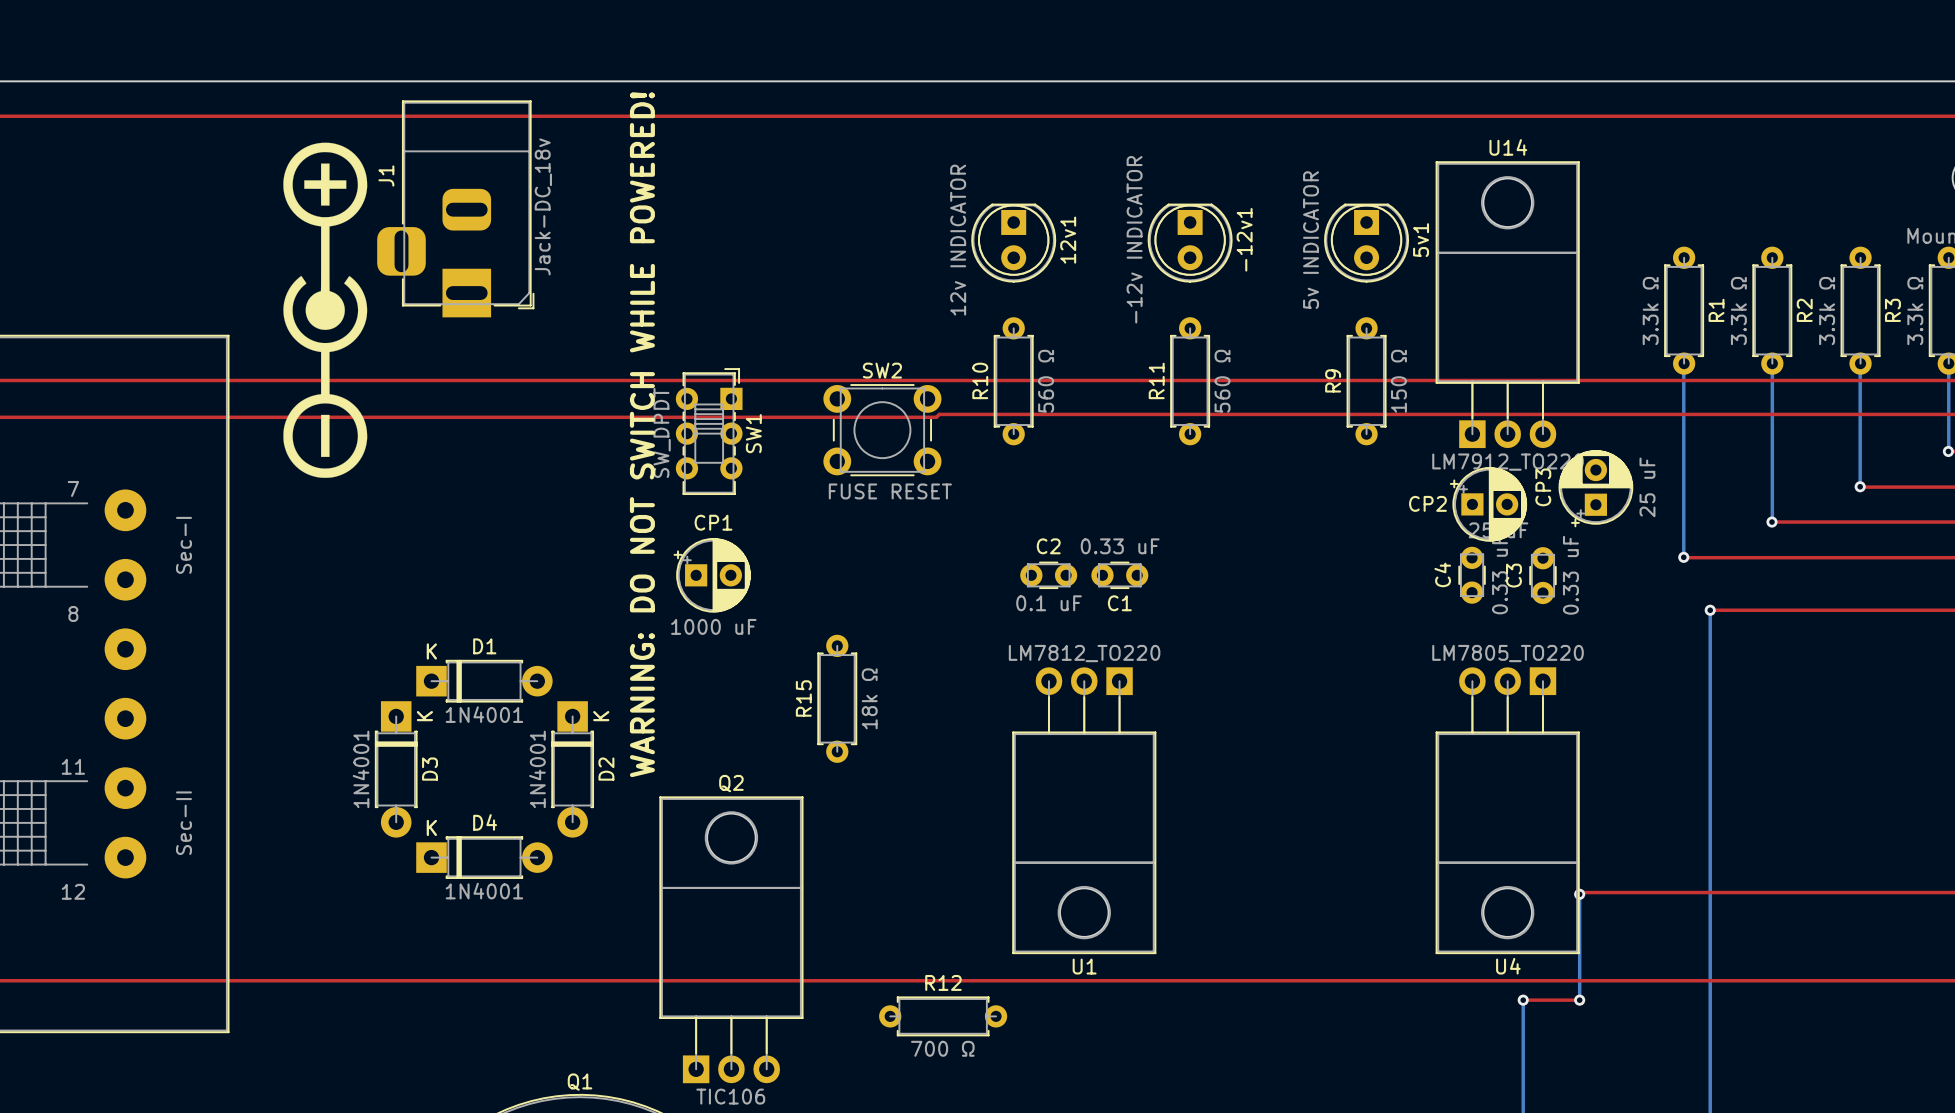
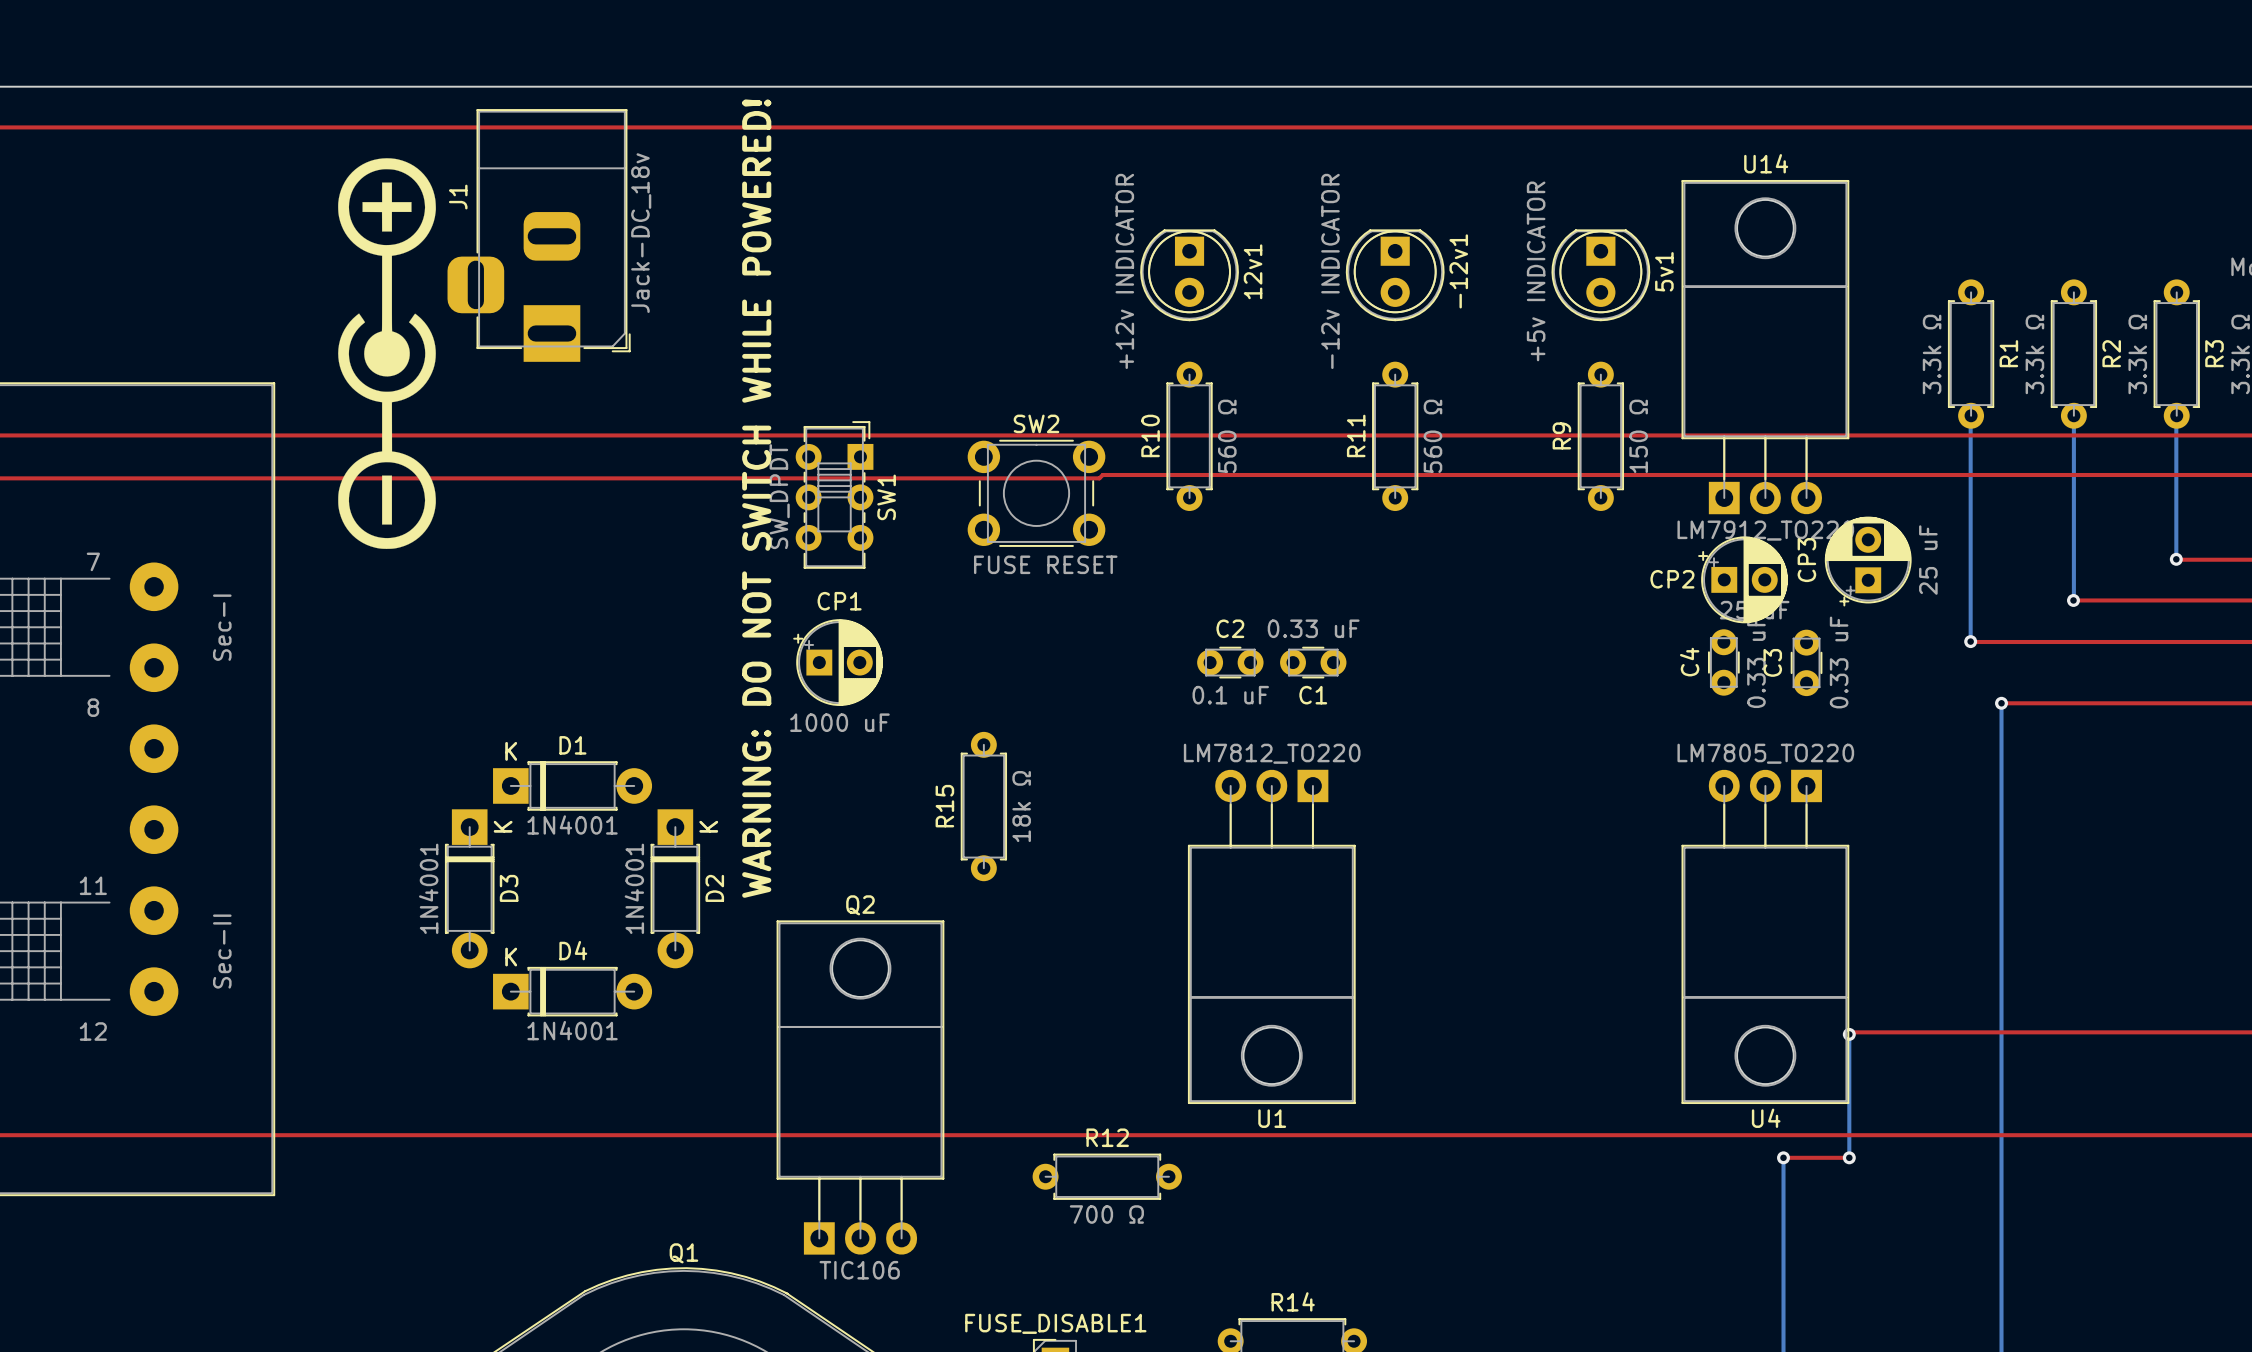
12v1 value: 12v INDICATOR (958, 240) -> +12v INDICATOR (1124, 271)
5v1 value: 5v INDICATOR (1311, 240) -> +5v INDICATOR (1536, 271)

